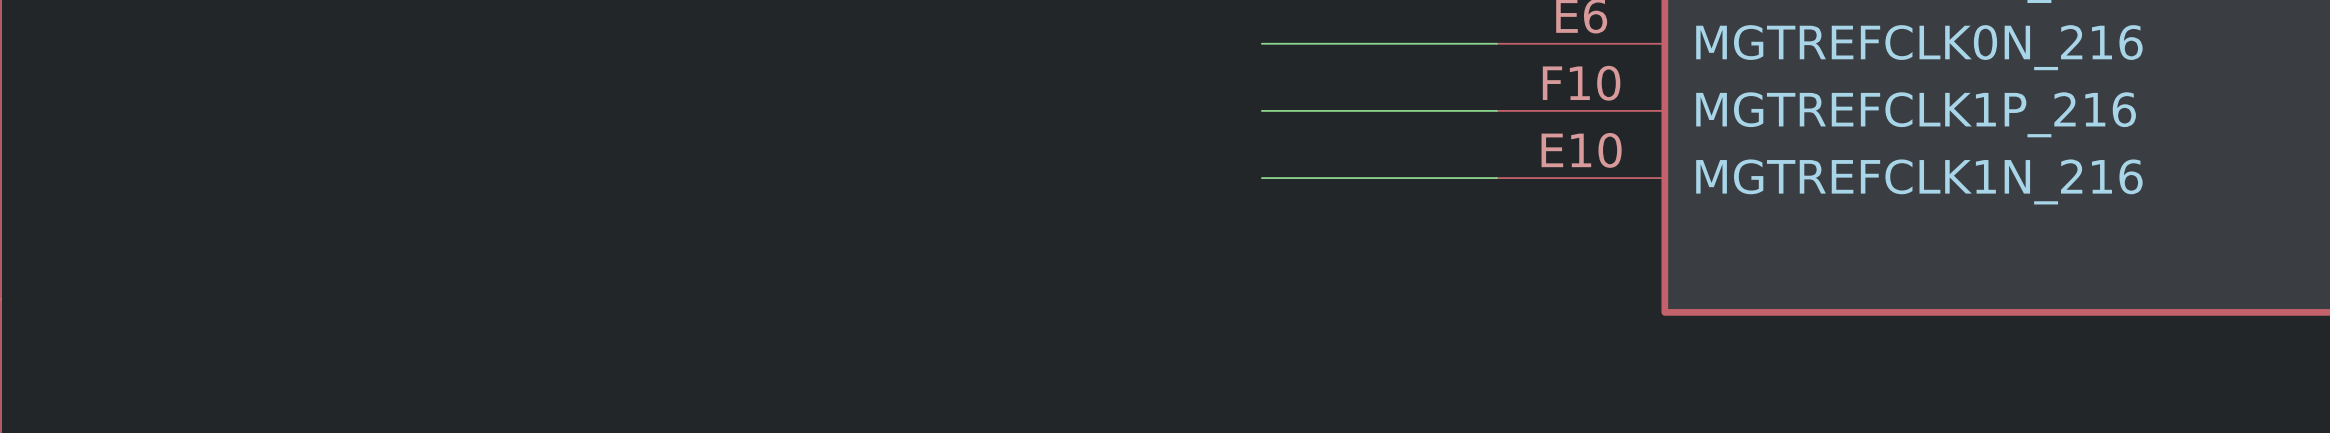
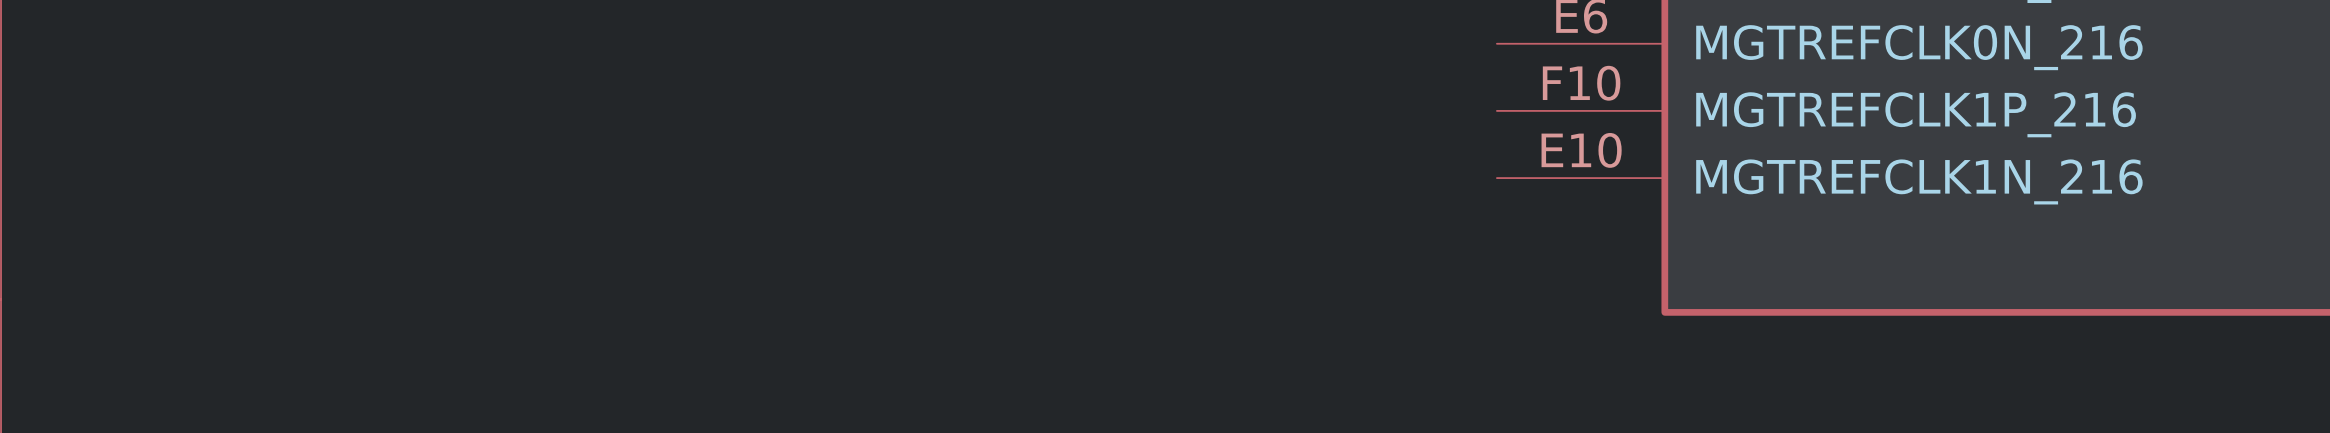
wire: (1261, 43) (1496, 43) -> none
wire: (1261, 110) (1496, 110) -> none
wire: (1261, 178) (1496, 178) -> none

